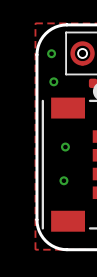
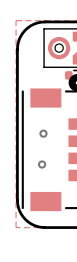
via: (51, 53) -> none
via: (53, 81) -> none

